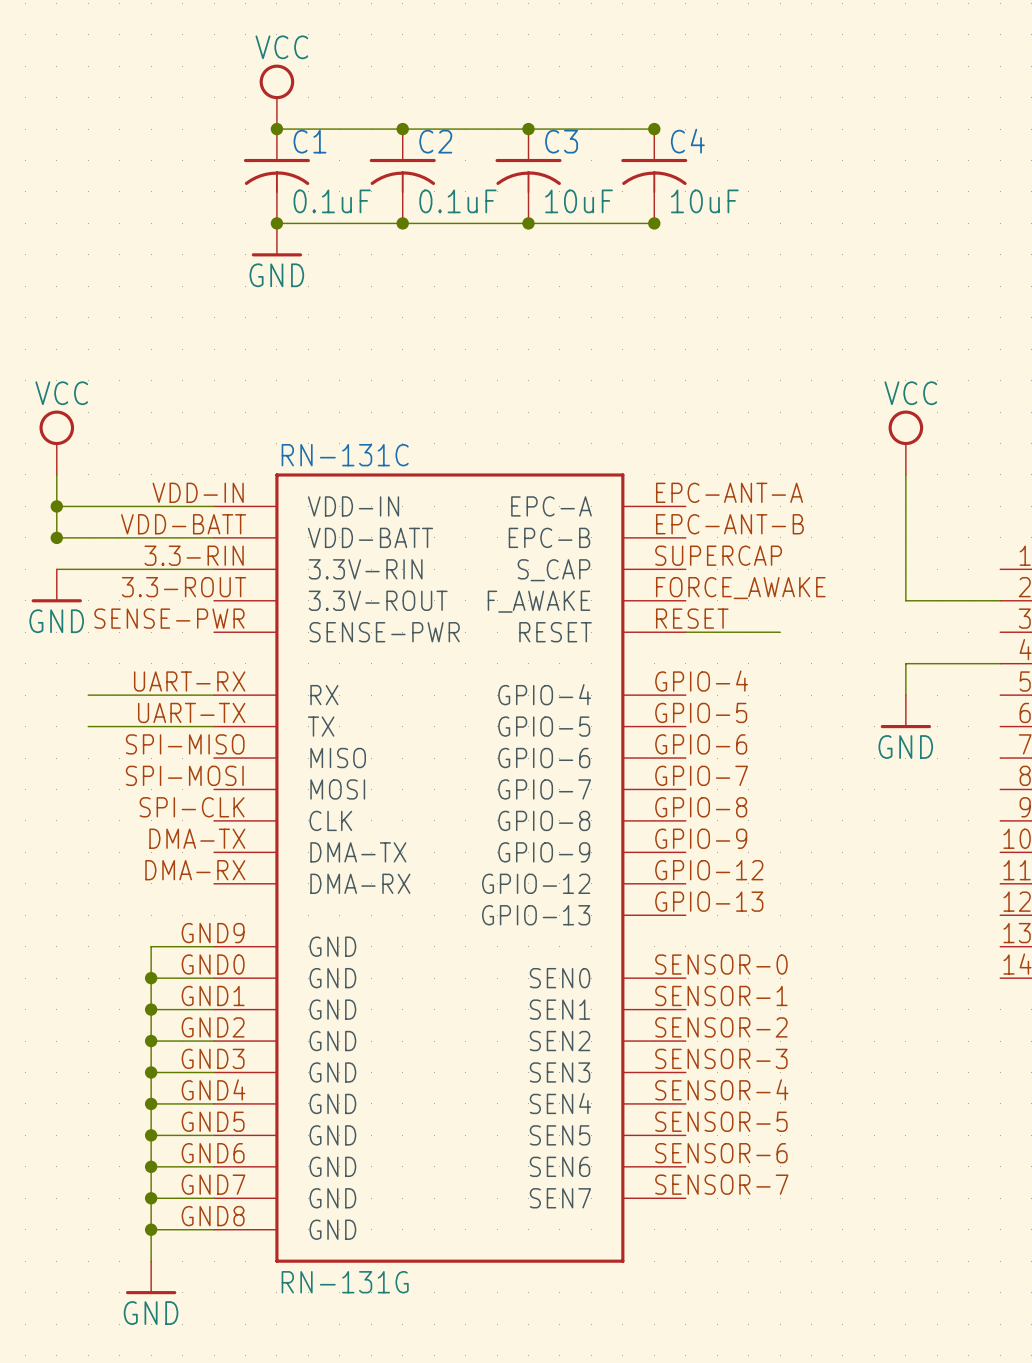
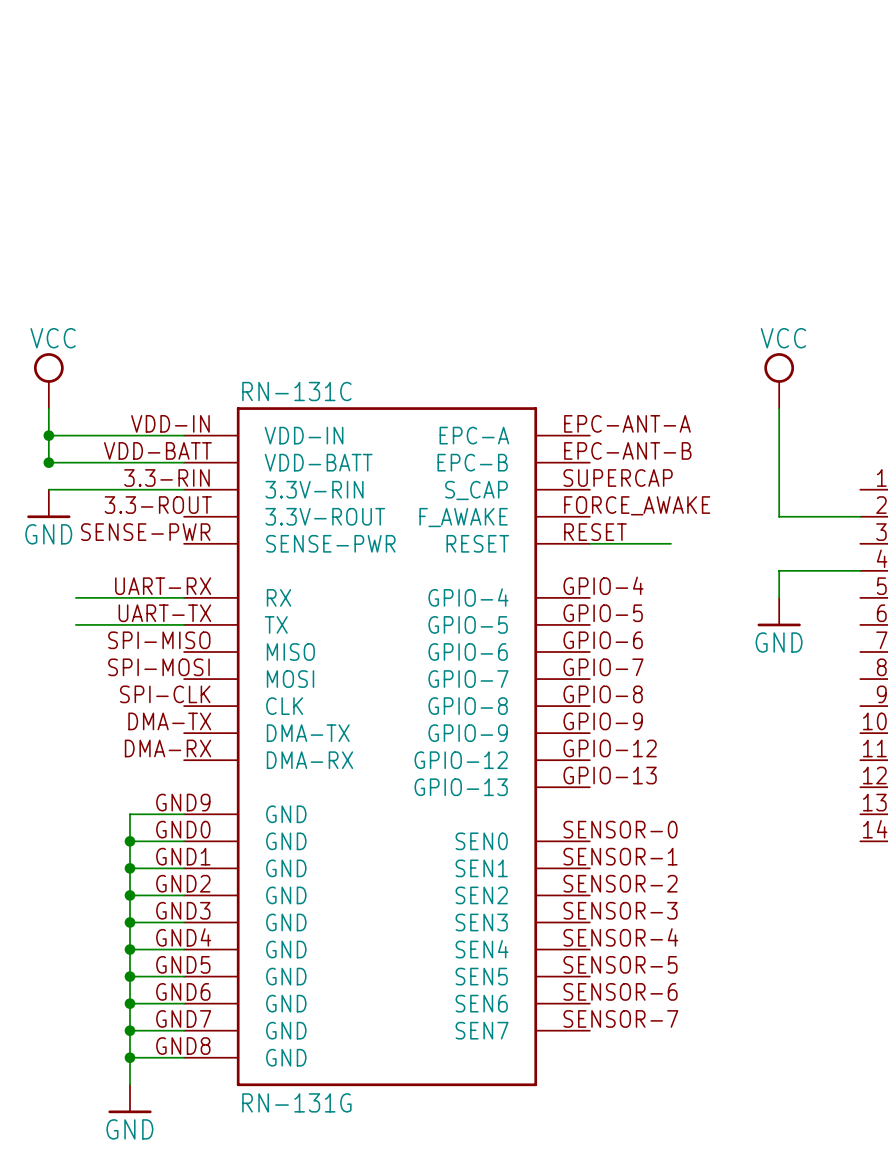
power symbol: VCC (276, 96) -> none
wire: (276, 129) (654, 129) -> none
junction: (276, 129) -> none
junction: (402, 129) -> none
junction: (528, 129) -> none
junction: (654, 129) -> none
C1: 0.1uF (276, 176) -> none
C2: 0.1uF (402, 176) -> none
C3: 10uF (528, 176) -> none
C4: 10uF (654, 176) -> none
wire: (276, 223) (654, 223) -> none
junction: (276, 223) -> none
junction: (402, 223) -> none
junction: (528, 223) -> none
junction: (654, 223) -> none
power symbol: GND (276, 239) -> none

